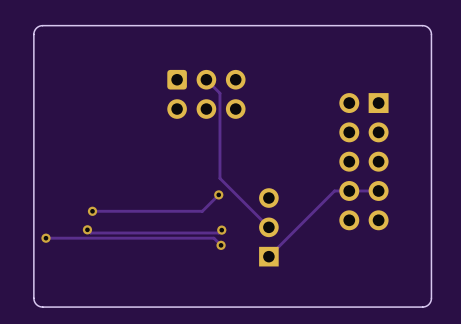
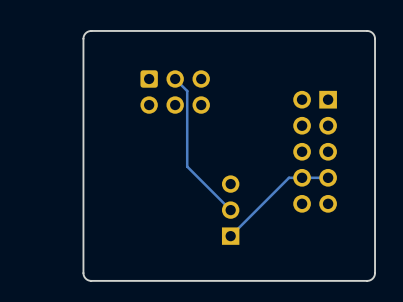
board edge: (111, 25) (41, 25) (35, 29) (33, 34) (34, 300) (41, 306) (111, 307) -> (91, 30) (85, 33) (83, 38) (83, 273) (85, 278) (91, 280)
track: (218, 194) (202, 211) (92, 211) -> none
via: (218, 194) -> none
via: (92, 211) -> none
track: (87, 229) (90, 233) (218, 233) (221, 230) -> none
via: (87, 229) -> none
via: (221, 230) -> none
track: (45, 238) (213, 238) (221, 245) -> none
via: (45, 238) -> none
via: (221, 245) -> none

